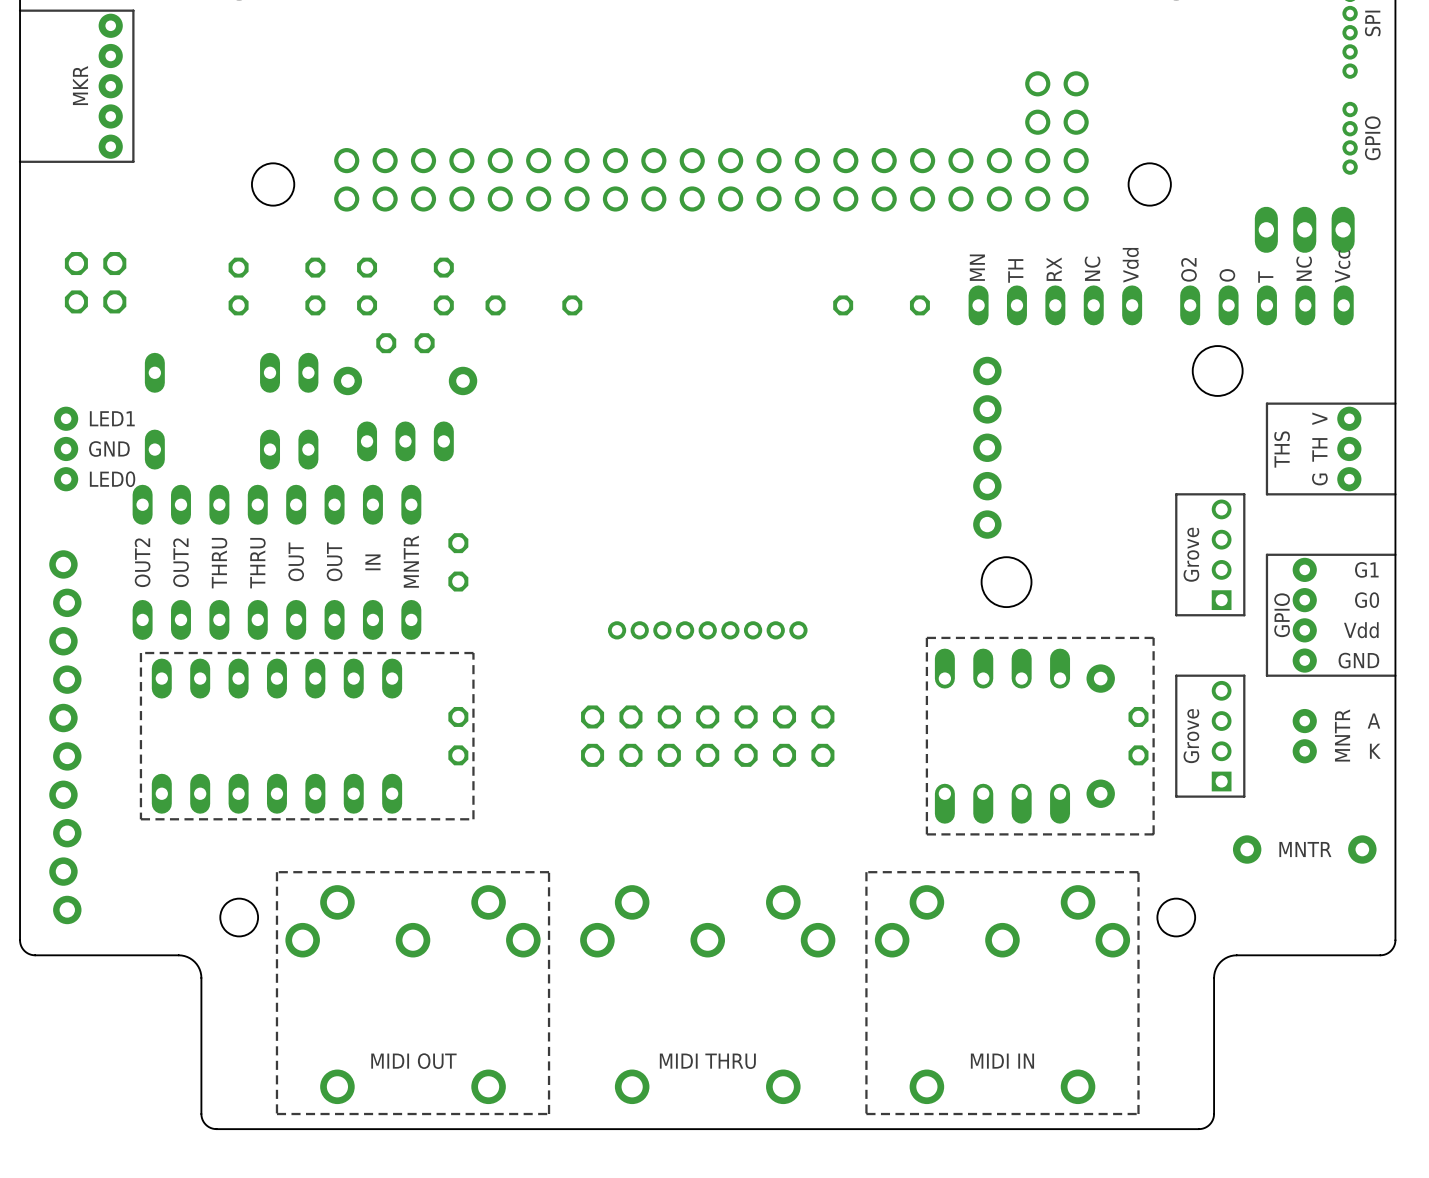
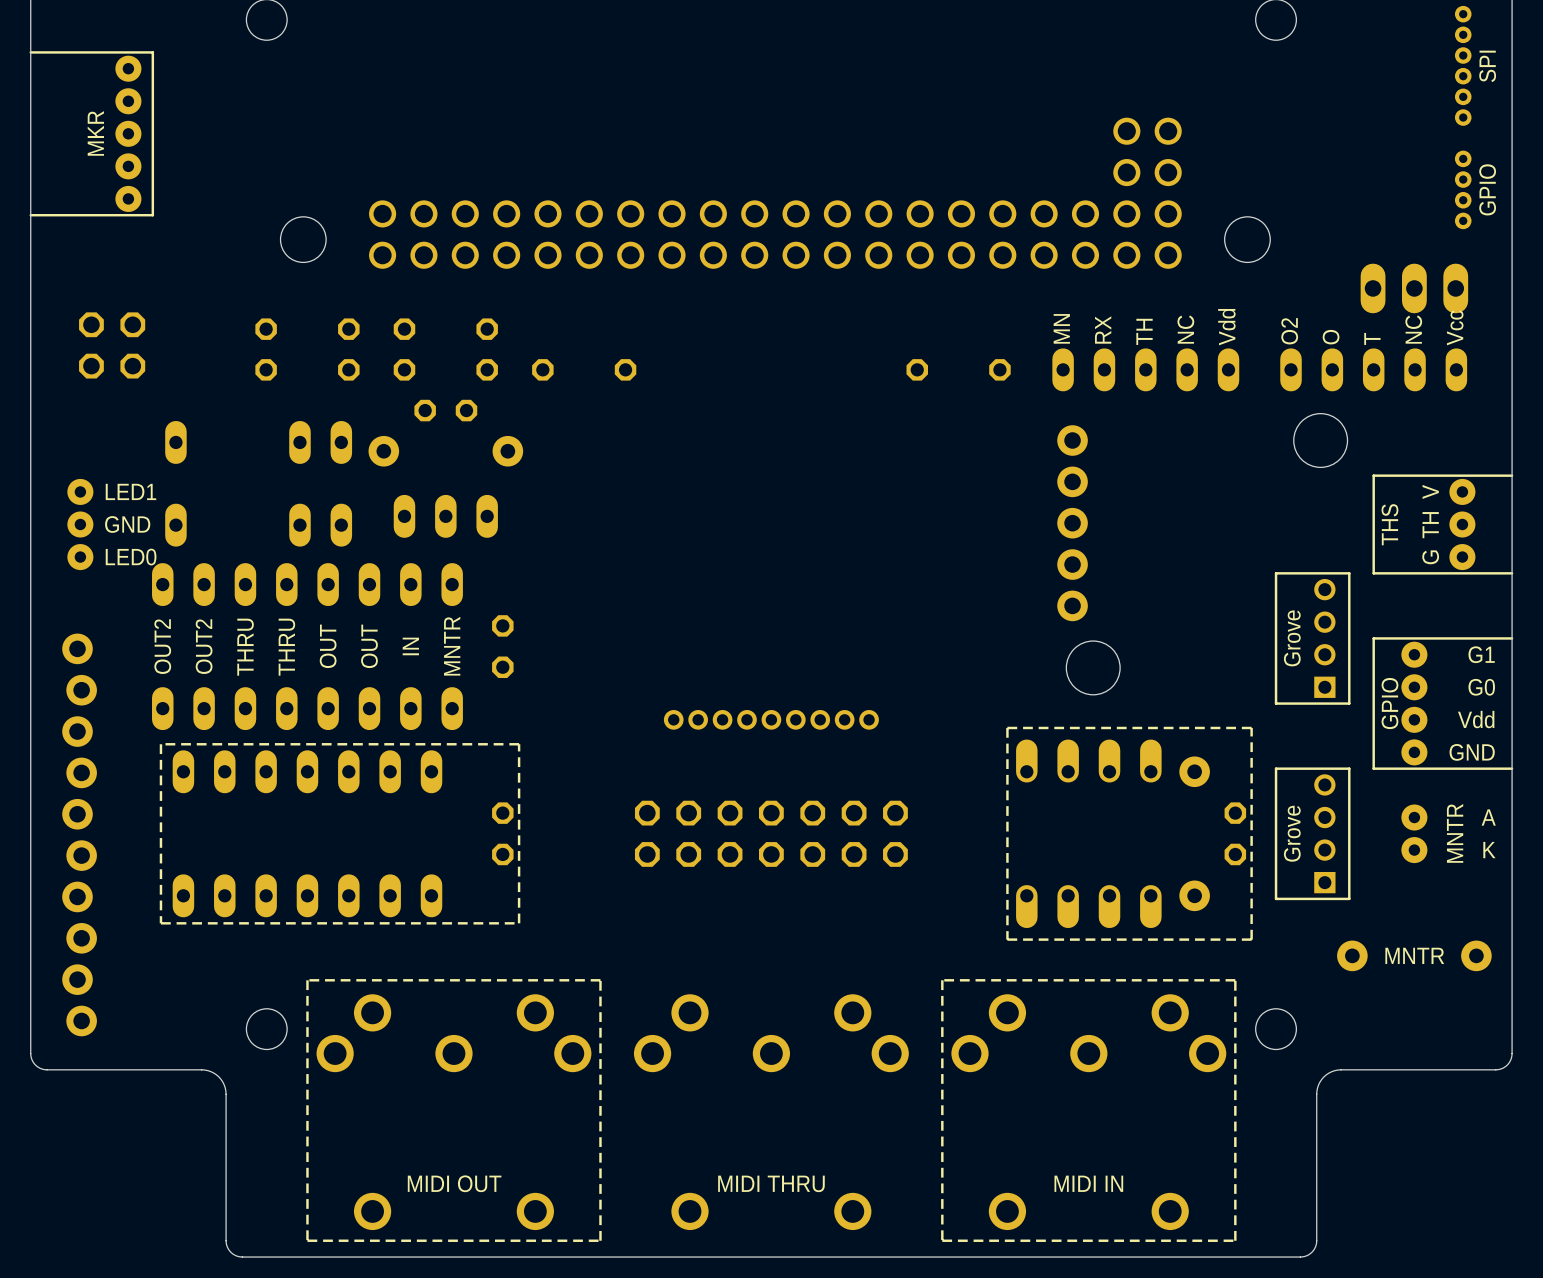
text: RX (1054, 269) -> TH (1144, 331)
text: TH (1015, 270) -> RX (1103, 330)

